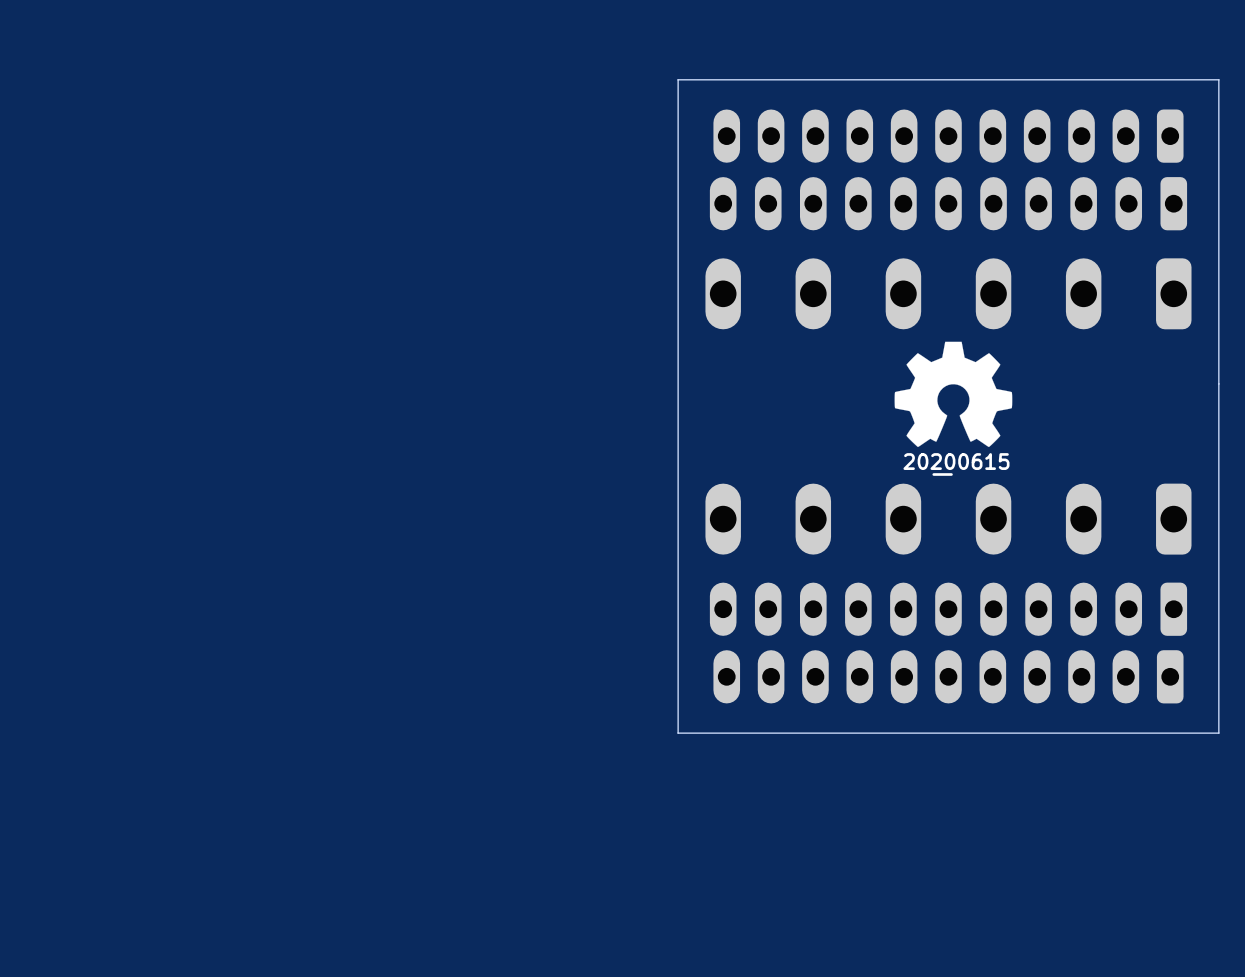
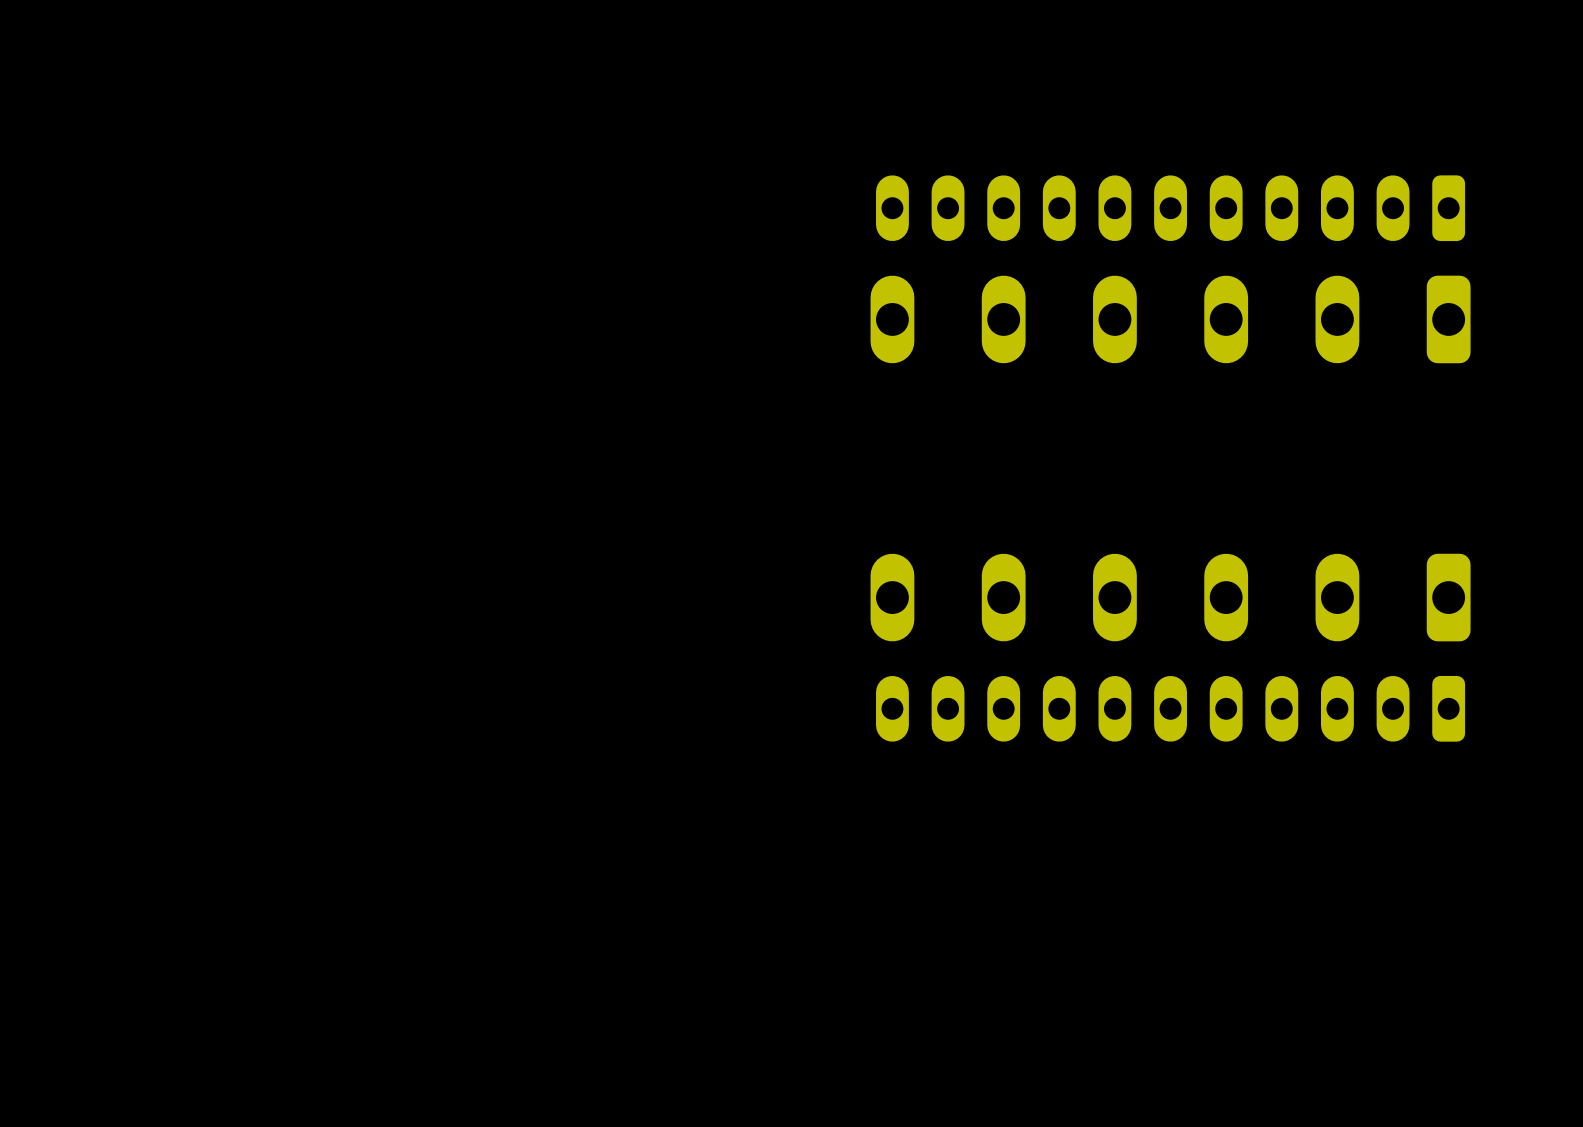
board edge: (1218, 79) (1218, 733) (678, 733) (678, 79) (1218, 79) -> none
part: (948, 136) -> none
drawing: [894, 341, 1013, 476] -> none
part: (948, 676) -> none

